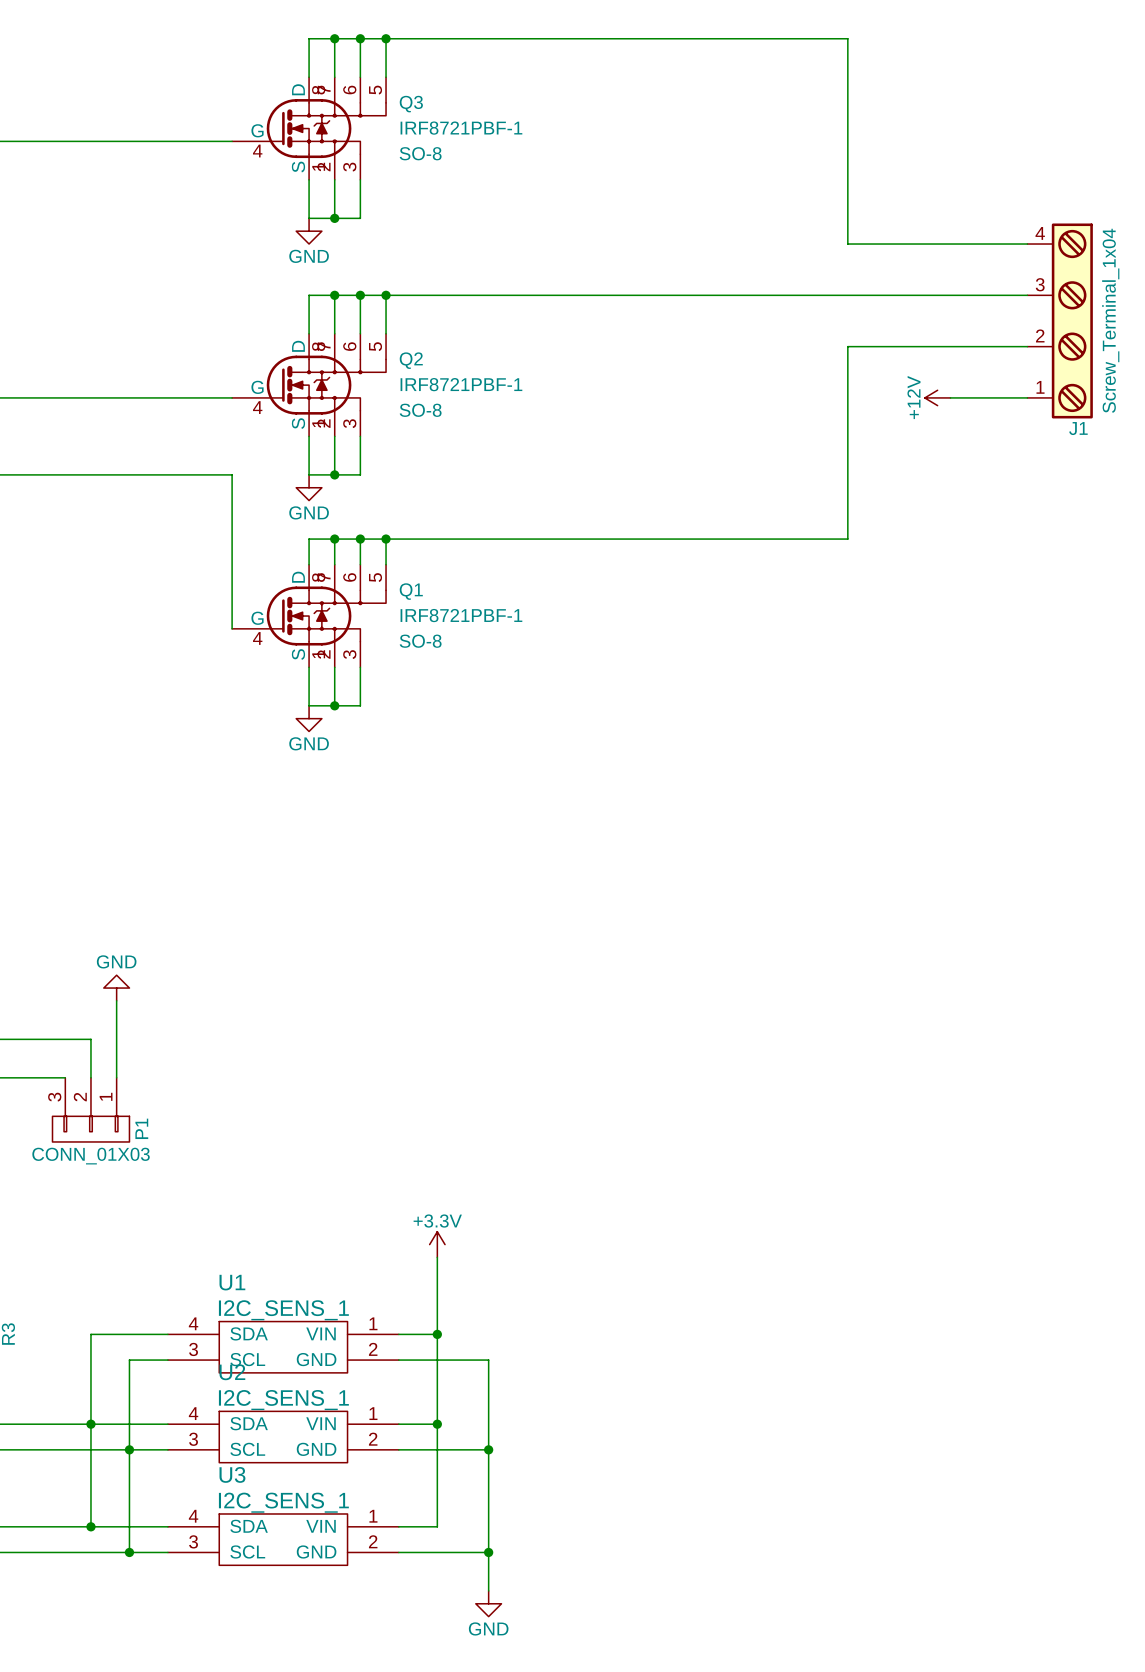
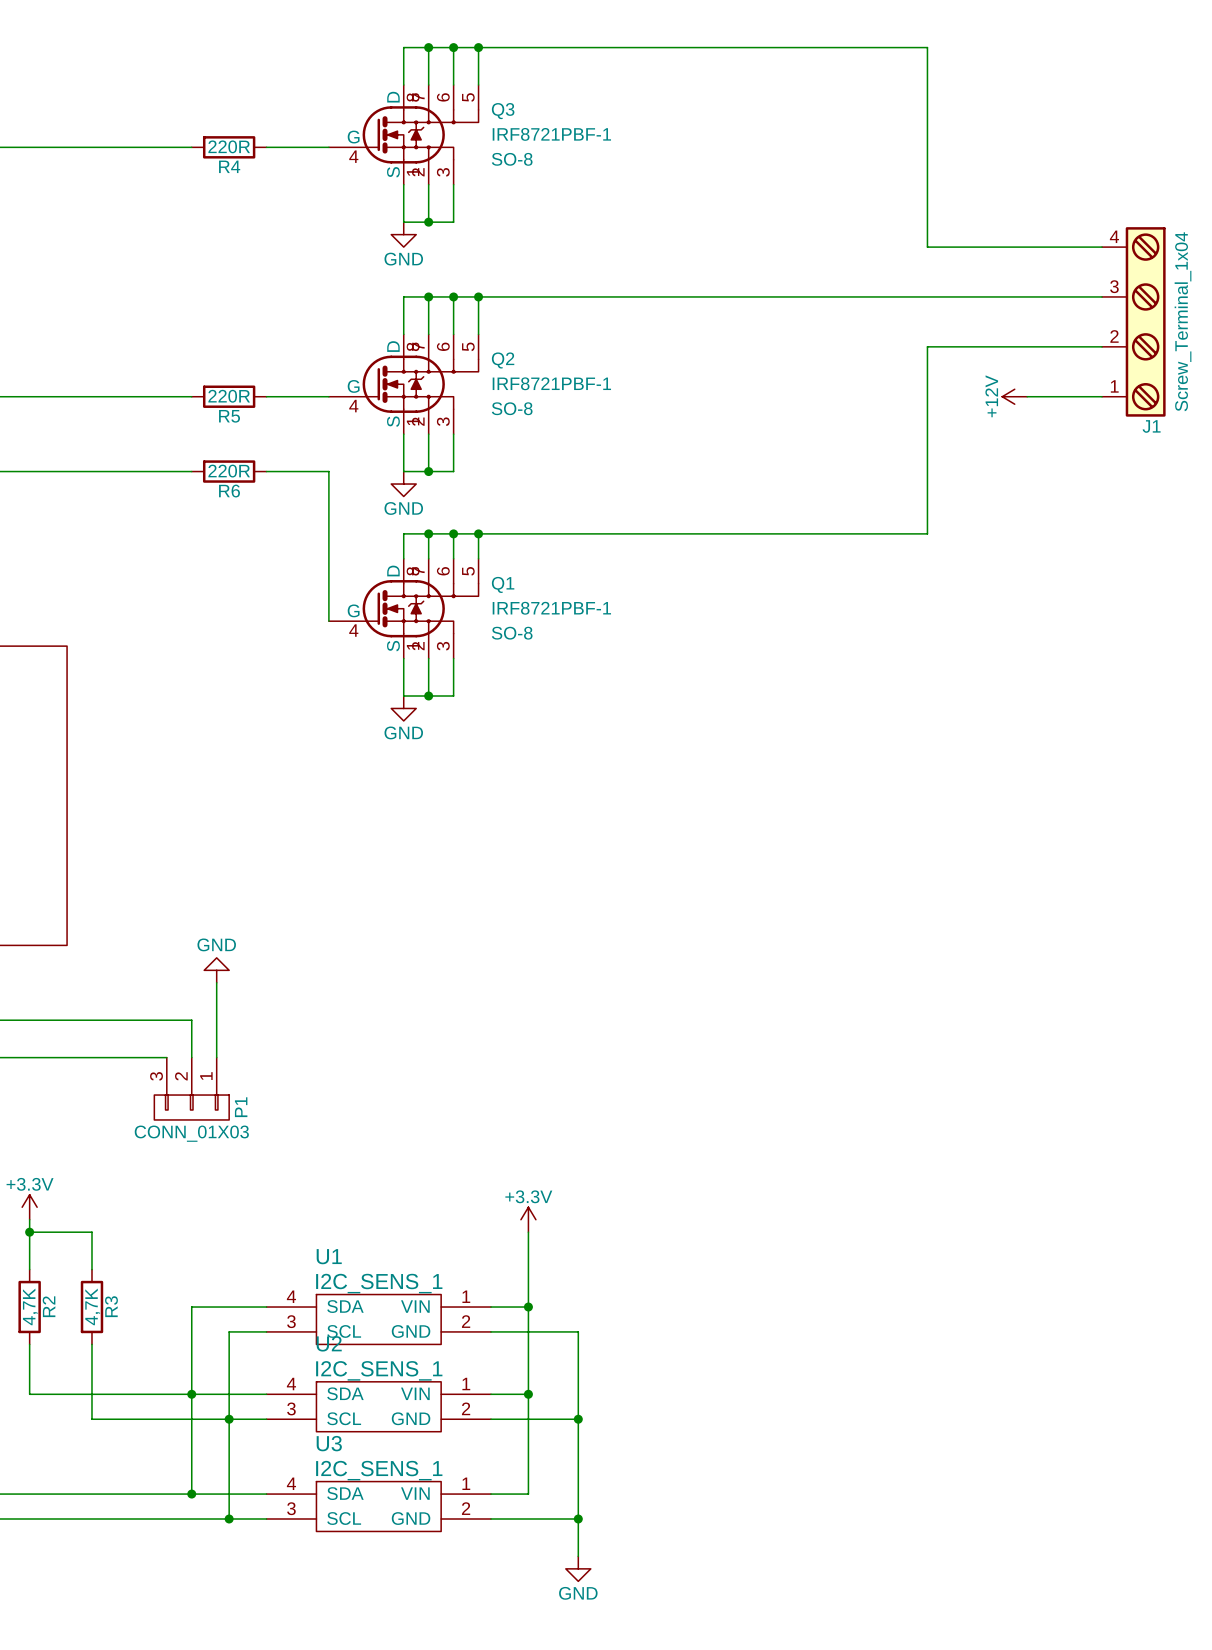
R4: none -> 220R (229, 147)
R5: none -> 220R (229, 396)
R6: none -> 220R (229, 471)

